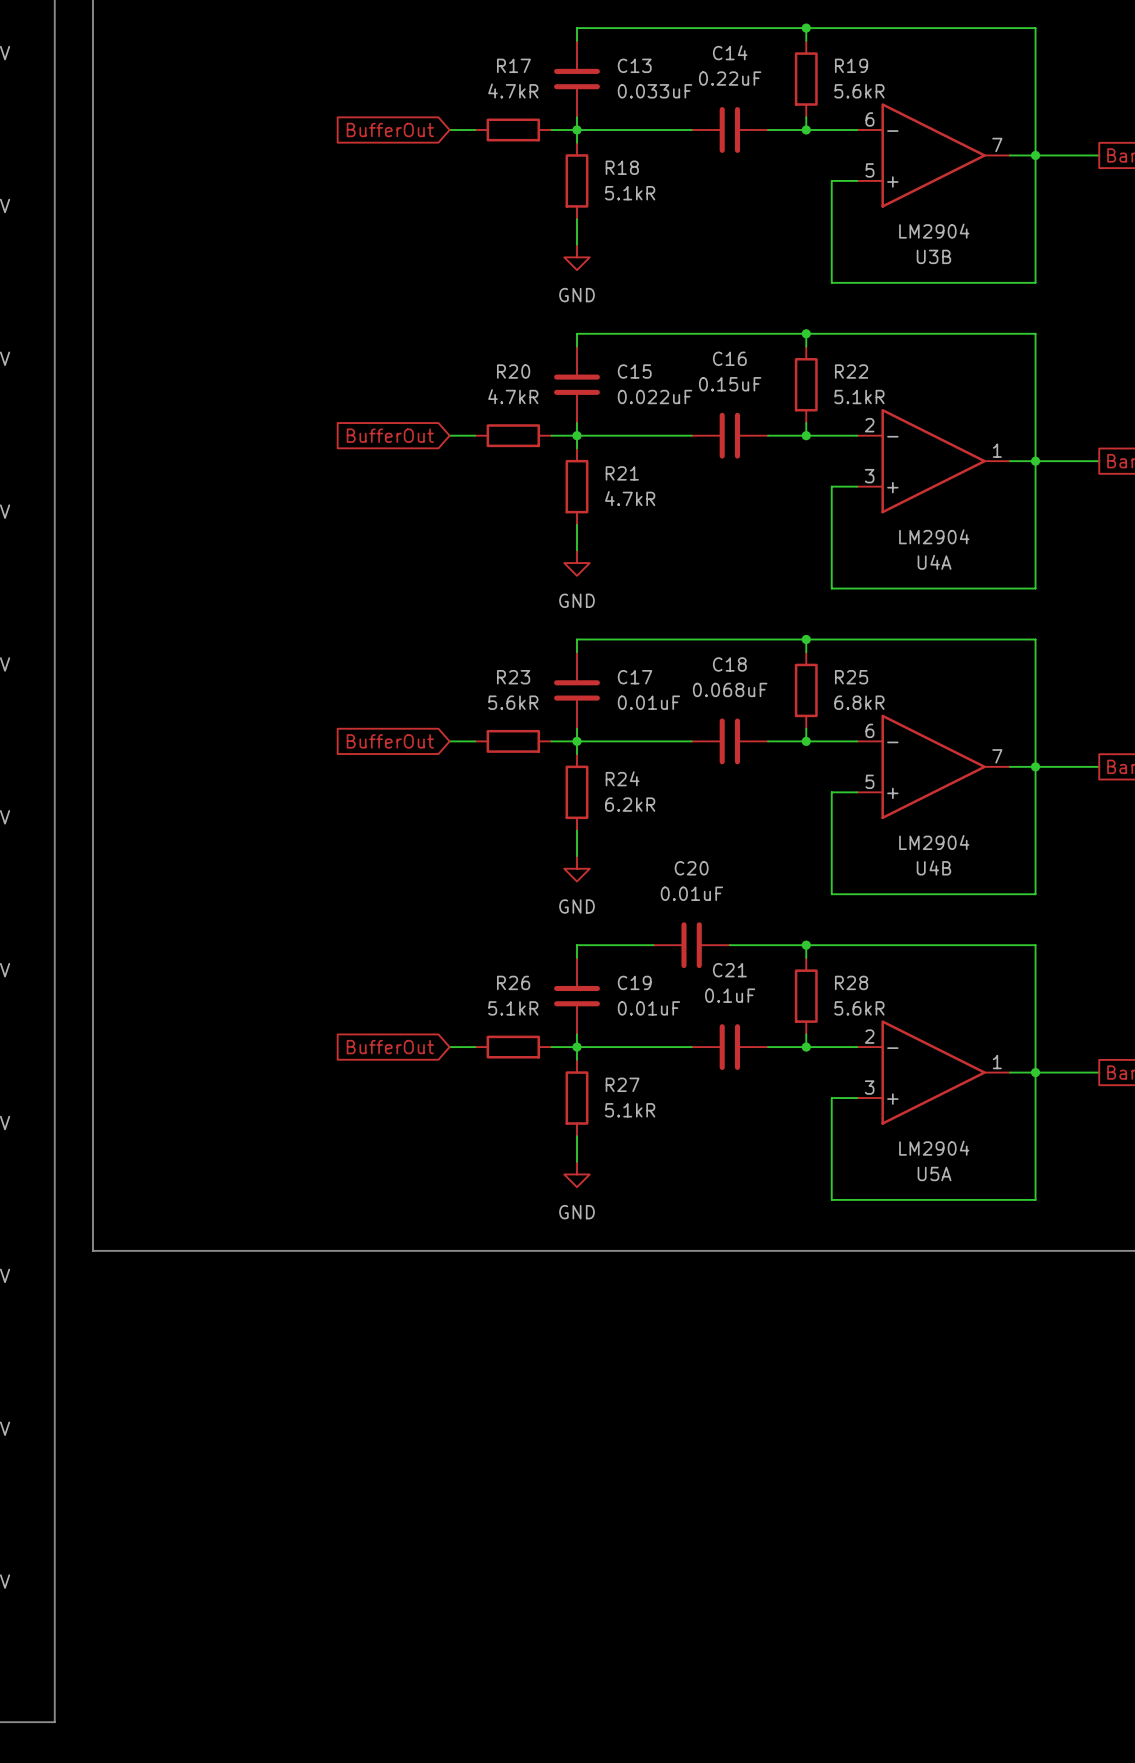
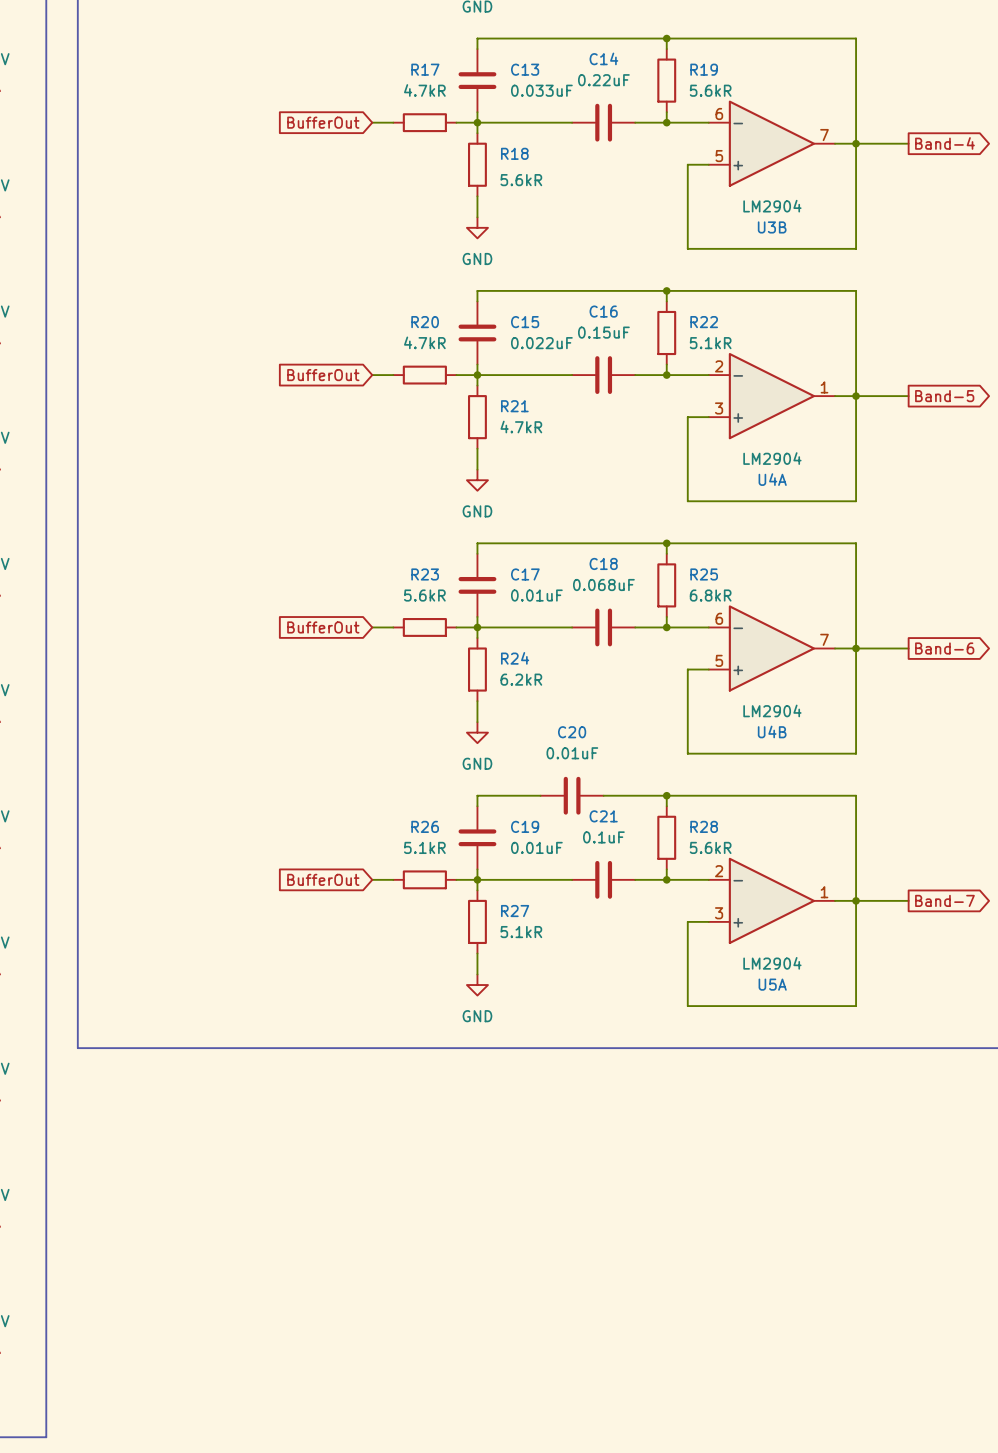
R18 value: 5.1kR (630, 193) -> 5.6kR (521, 180)

